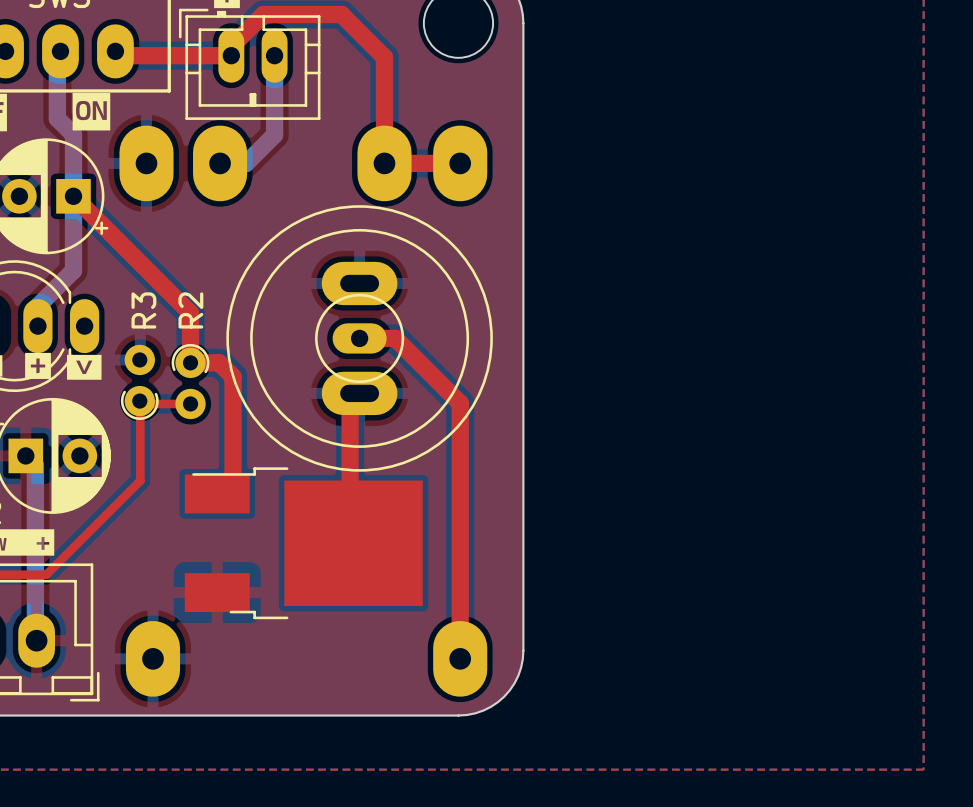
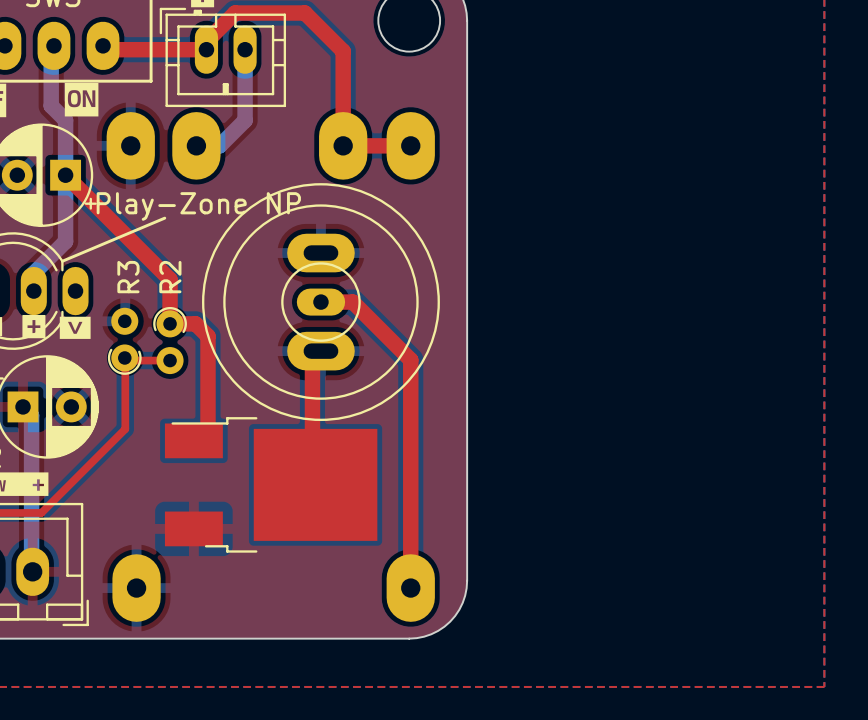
part text: none -> Play-Zone NP (198, 206)
line: none -> (164, 218) (62, 261)

